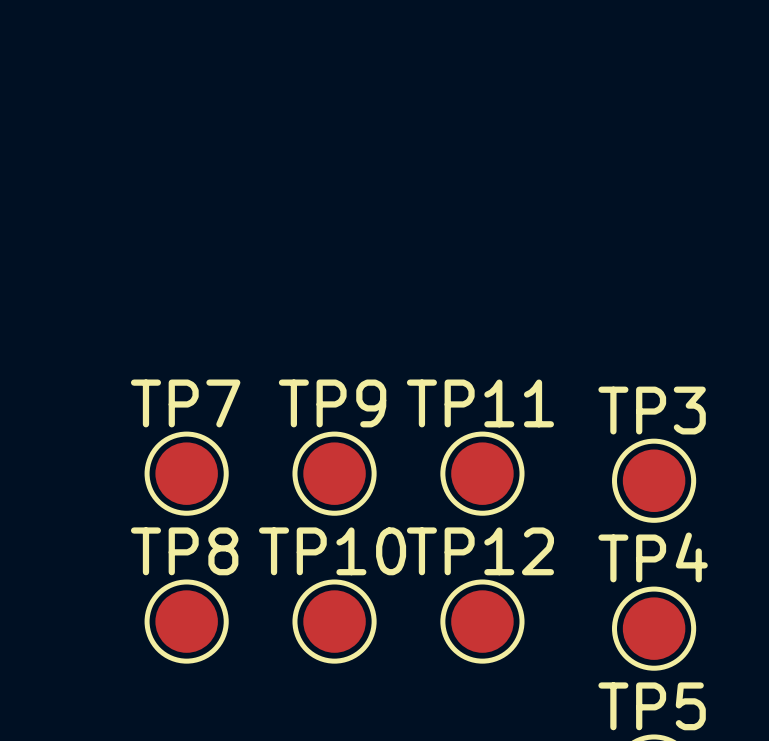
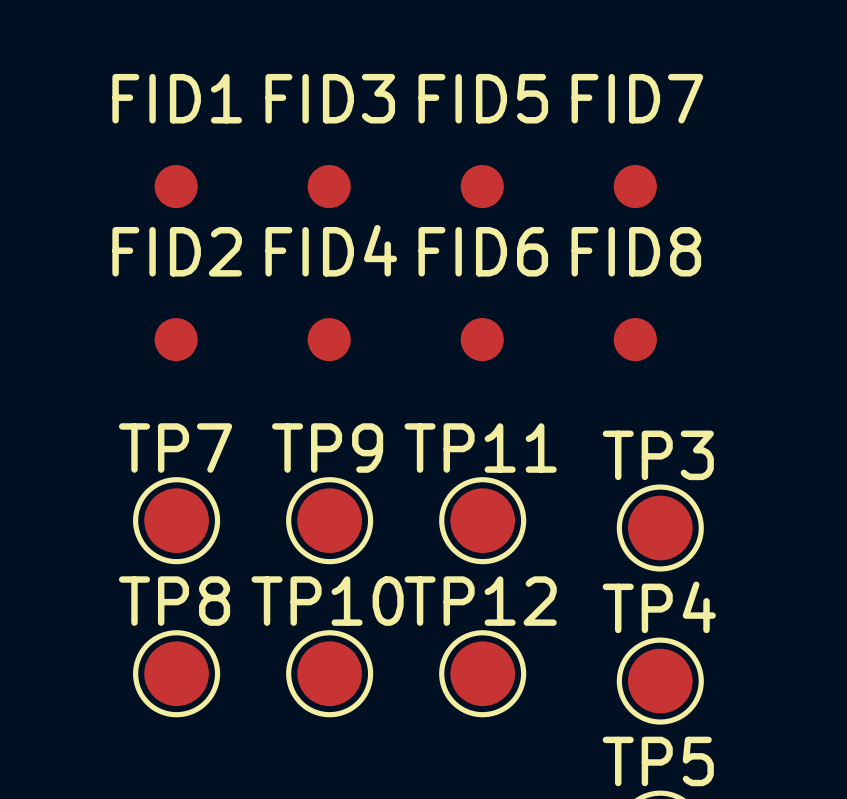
FID1: none -> (176, 186)
FID3: none -> (329, 186)
FID5: none -> (482, 186)
FID7: none -> (635, 186)
FID2: none -> (176, 339)
FID4: none -> (329, 339)
FID6: none -> (482, 339)
FID8: none -> (635, 339)

